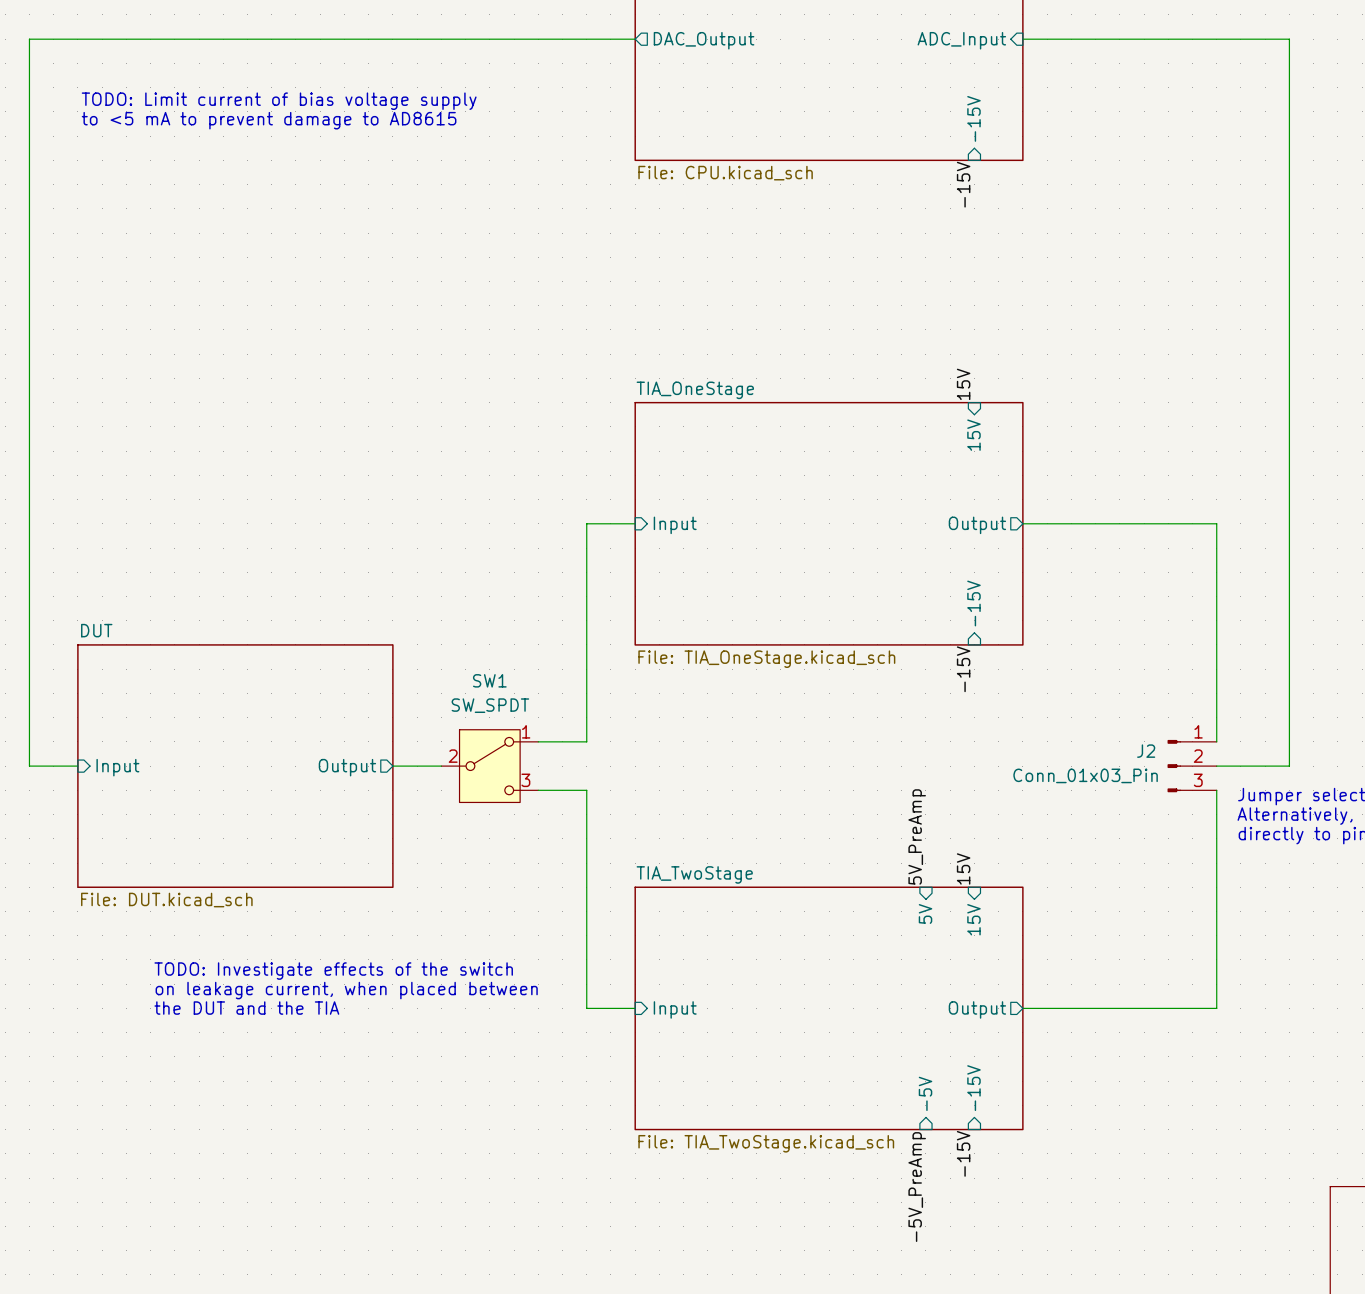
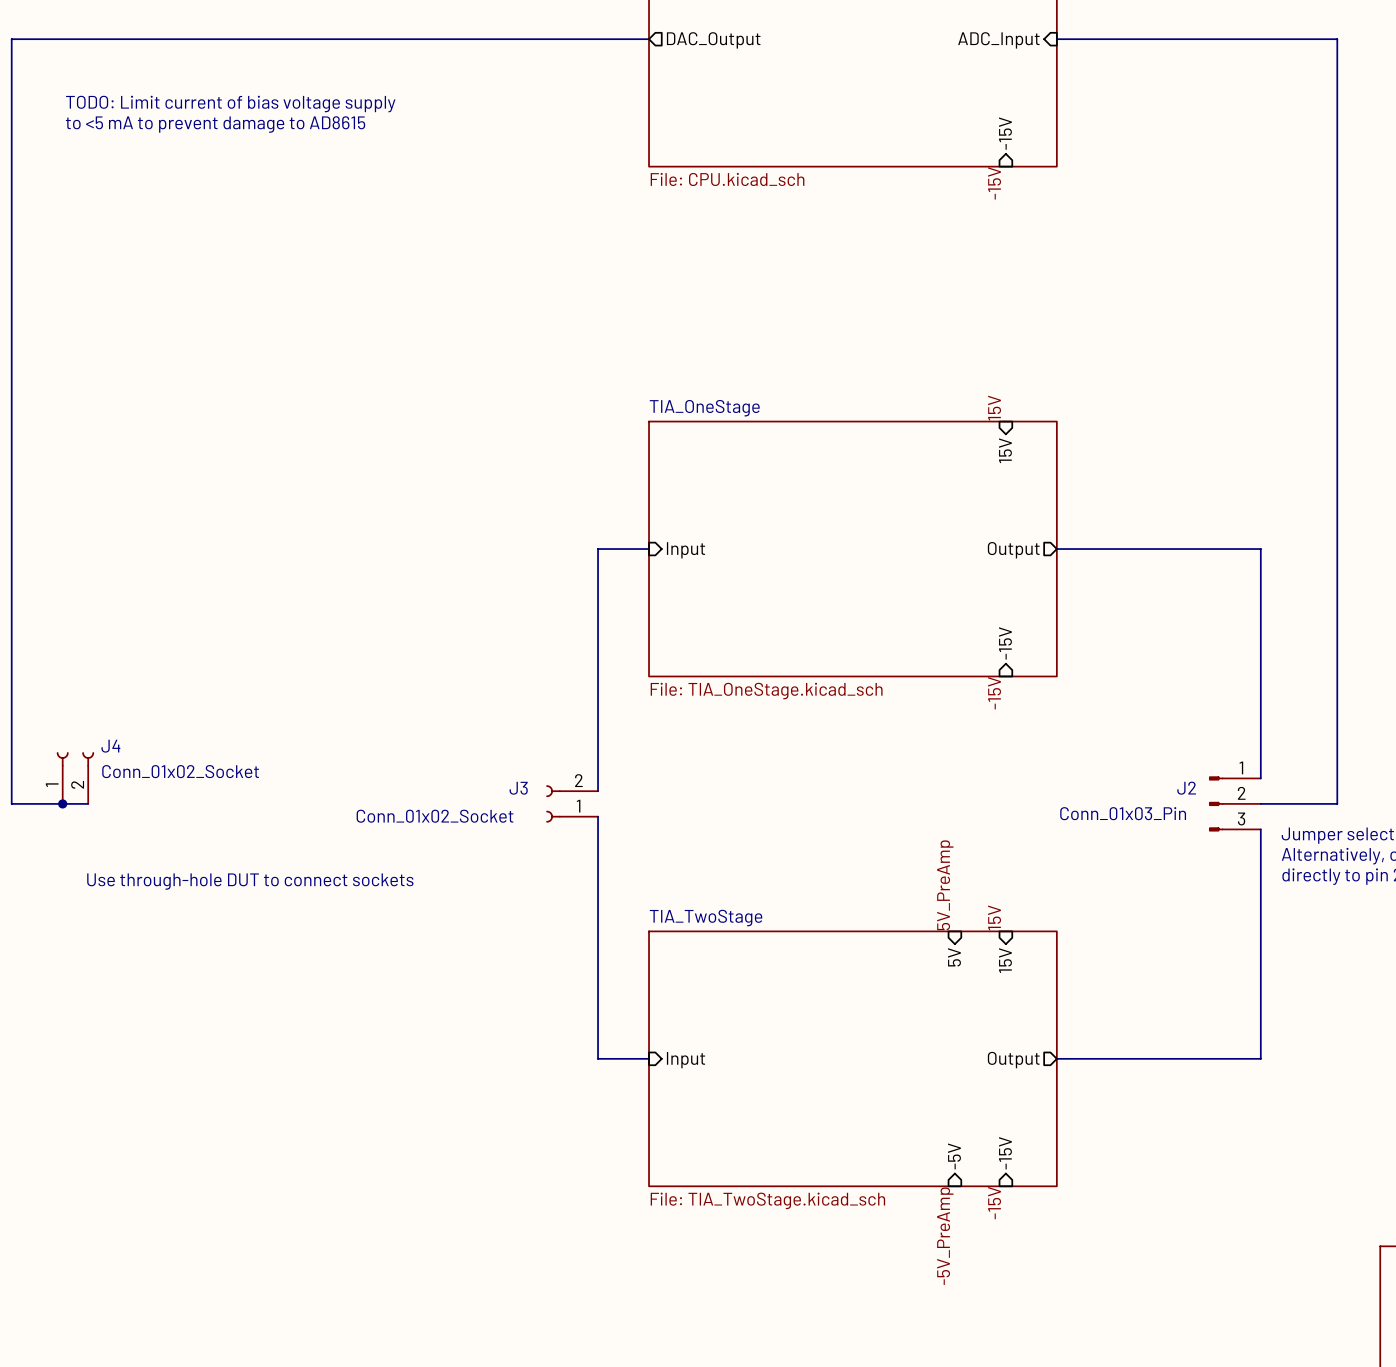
J4: none -> Conn_01x02_Socket (75, 778)
wire: (538, 741) (586, 741) -> (598, 791) (598, 778)
wire: none -> (62, 803) (88, 803)
junction: none -> (62, 803)
sheet DUT: File: DUT.kicad_sch (235, 766) -> none
wire: (392, 766) (441, 766) -> none
SW1: SW_SPDT (489, 766) -> none
J3: none -> Conn_01x02_Socket (572, 803)
sheet pin: Input (117, 767) -> none
sheet pin: Output (347, 767) -> none
wire: (538, 790) (586, 790) -> (598, 816) (598, 829)
text: none -> Use through-hole DUT to connect sockets (250, 881)
text: TODO: Investigate effects of the switch (333, 971) -> none
text: on leakage current, when placed between (346, 990) -> none
text: the DUT and the TIA (246, 1008) -> none

